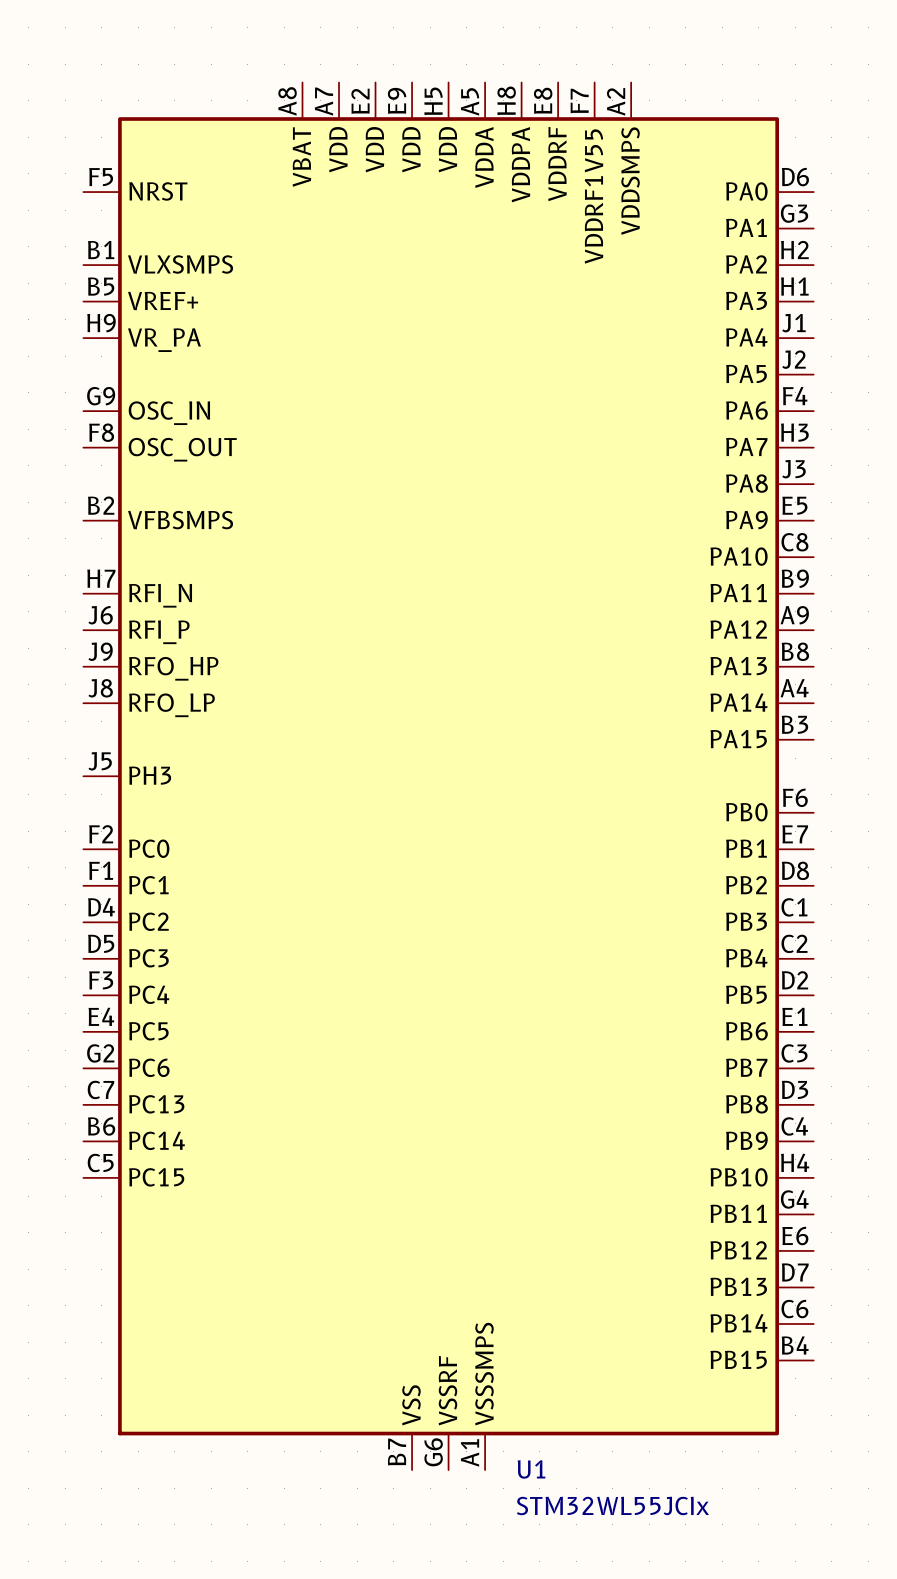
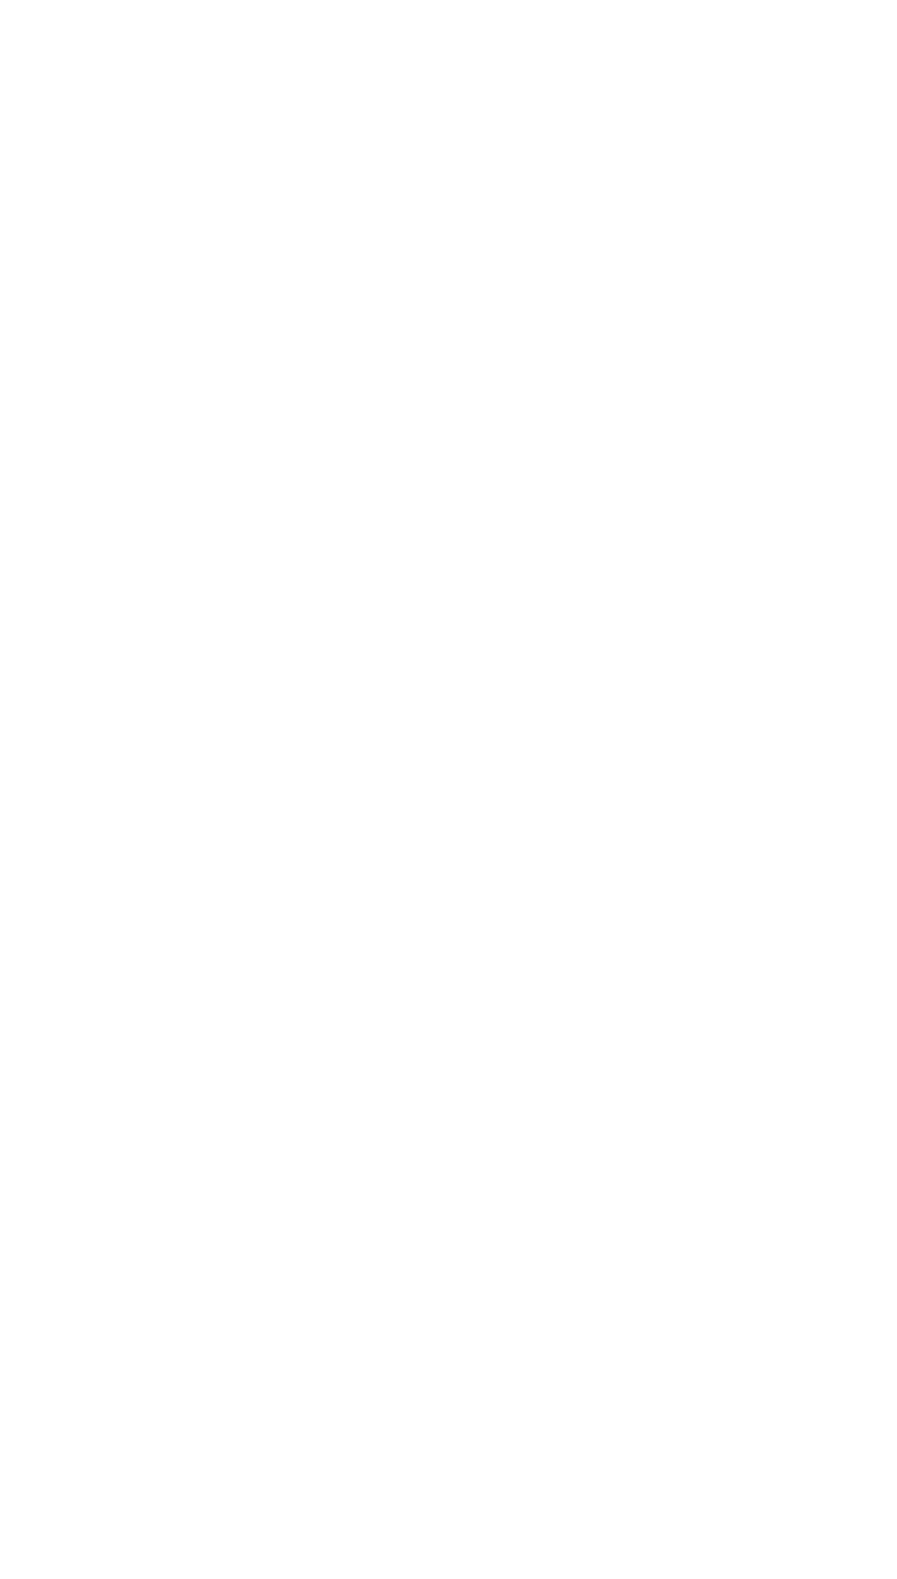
U1: STM32WL55JCIx (448, 776) -> none

